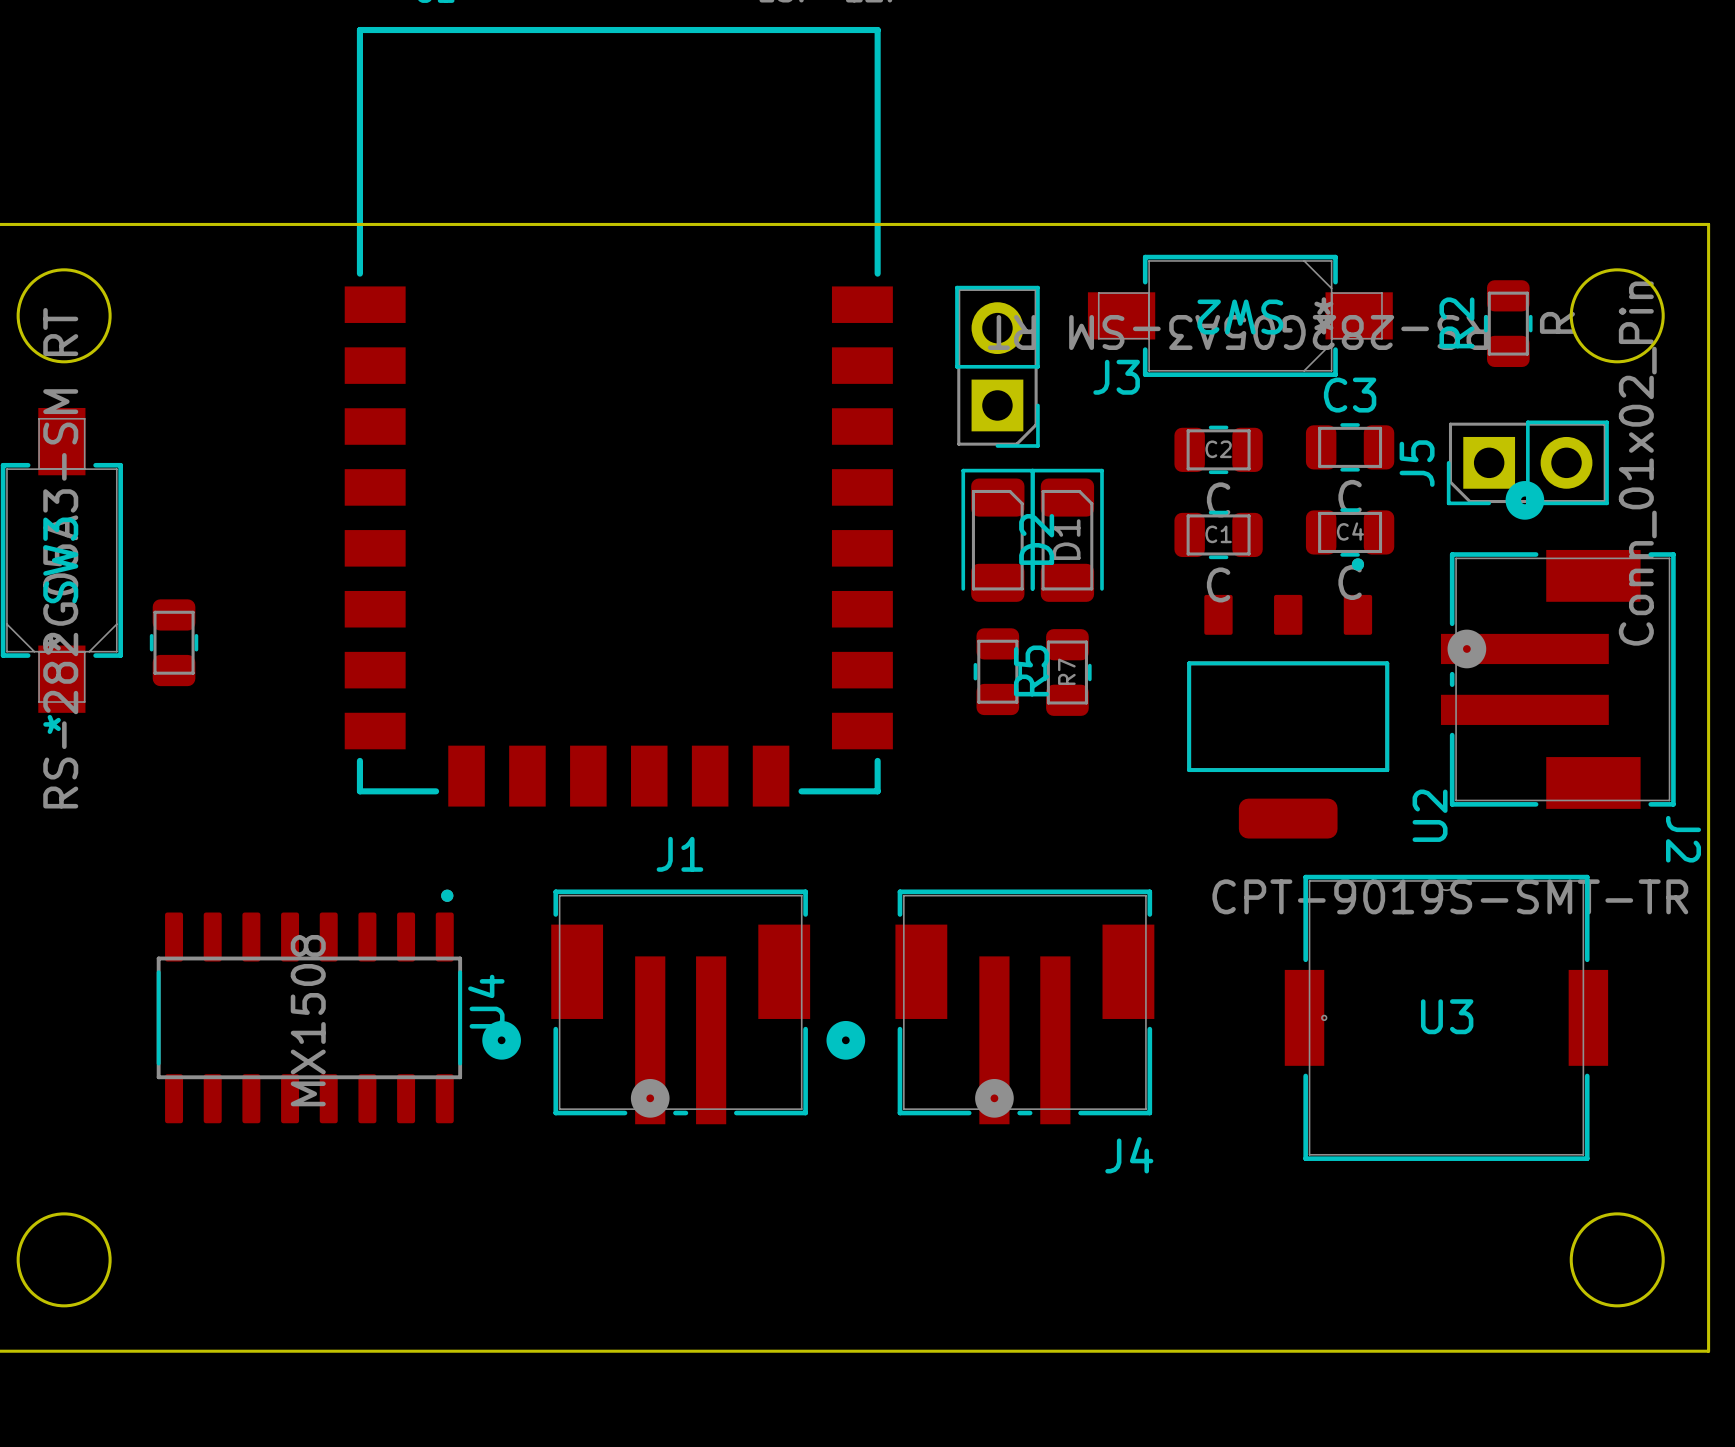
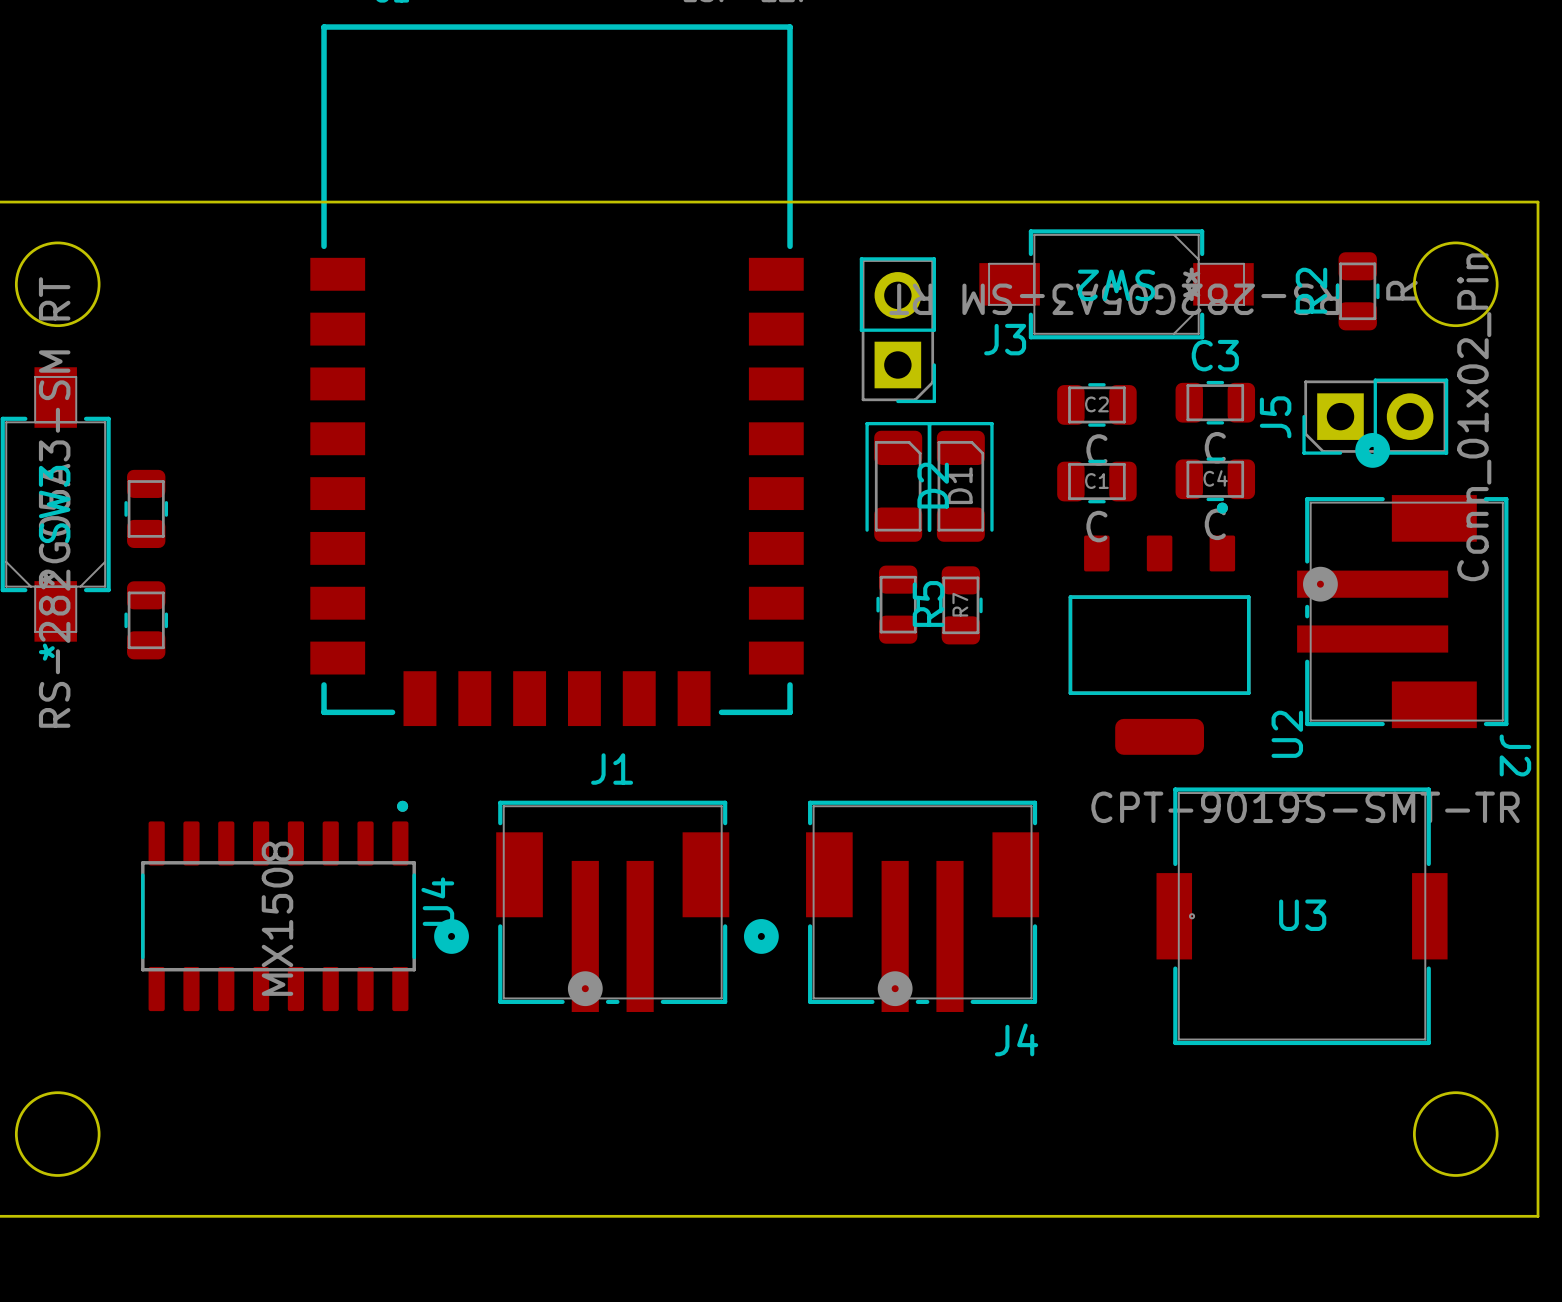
part: none -> (146, 508)
part: (174, 642) -> none
part: none -> (146, 620)

